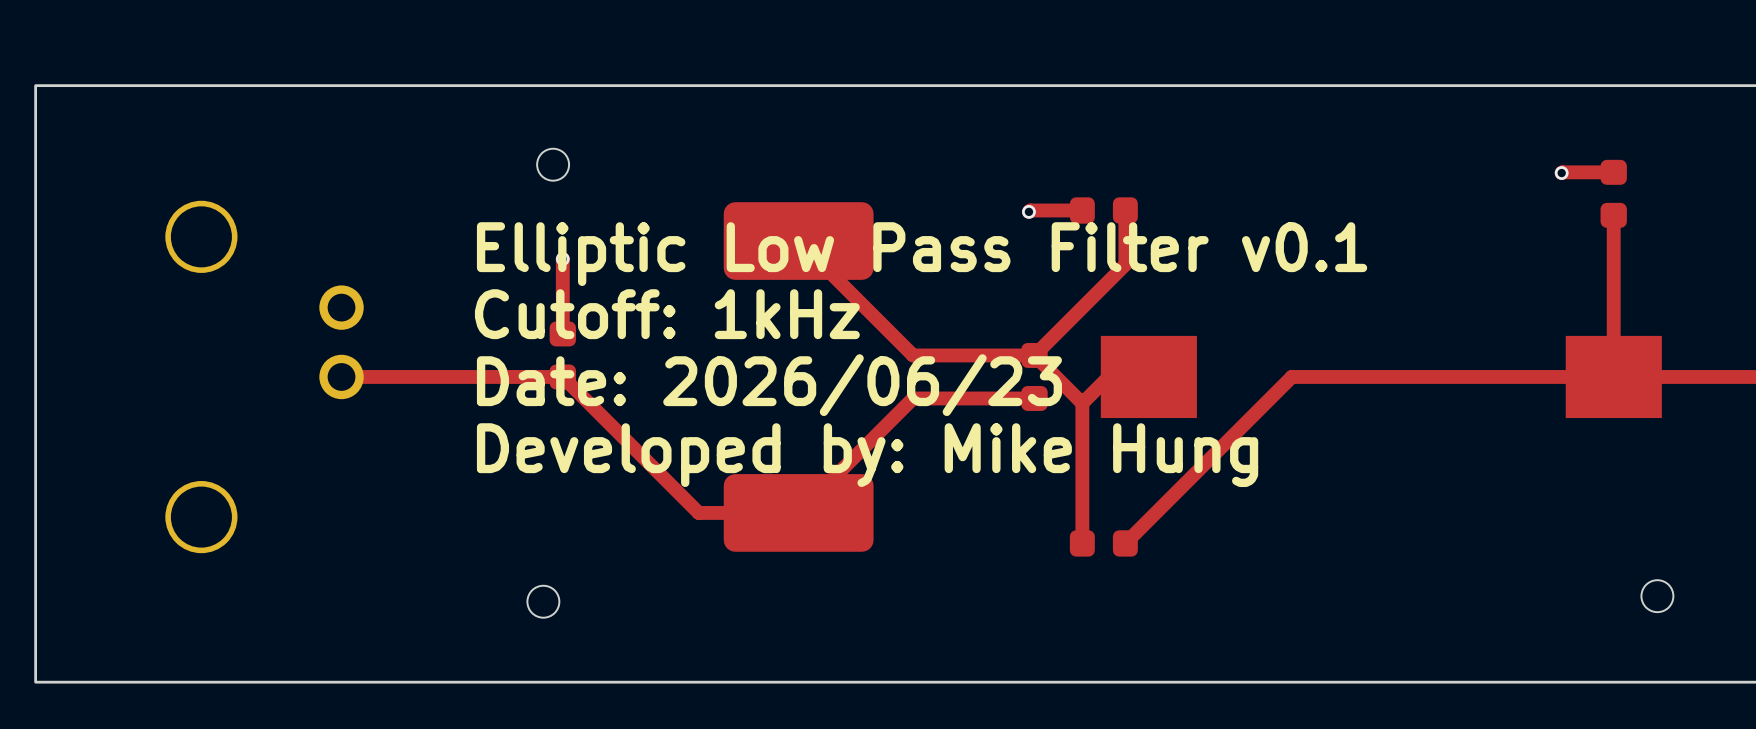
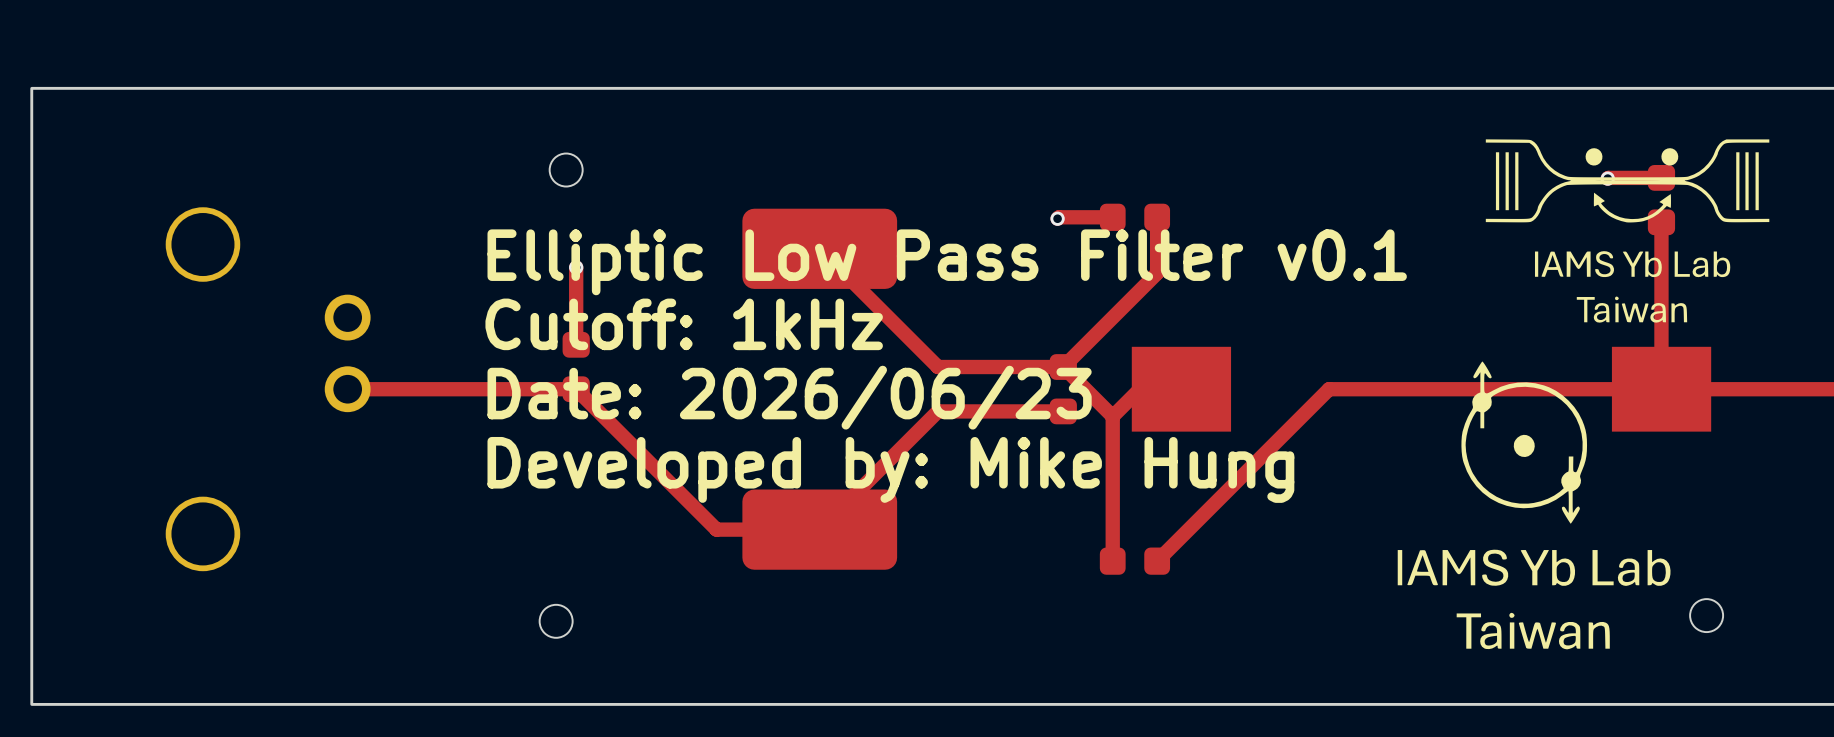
drawing: none -> [1485, 139, 1770, 323]
drawing: none -> [1397, 361, 1671, 650]

